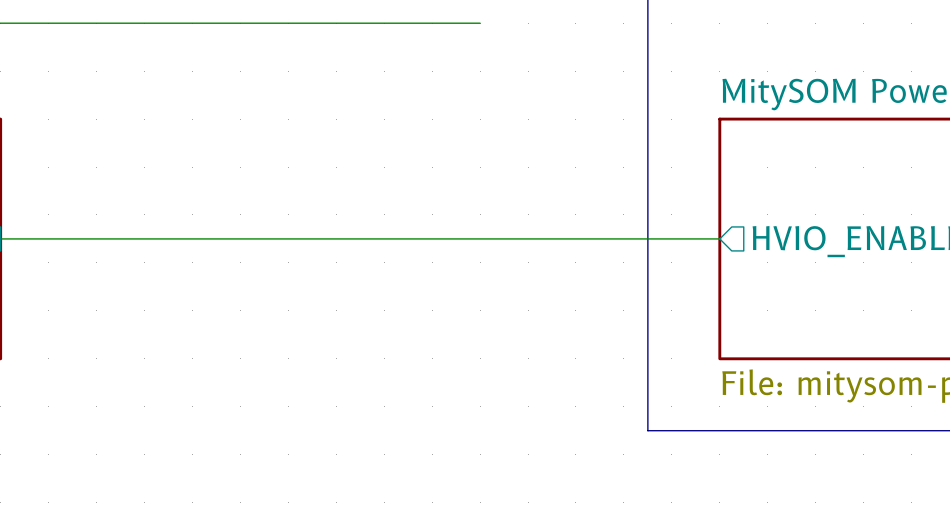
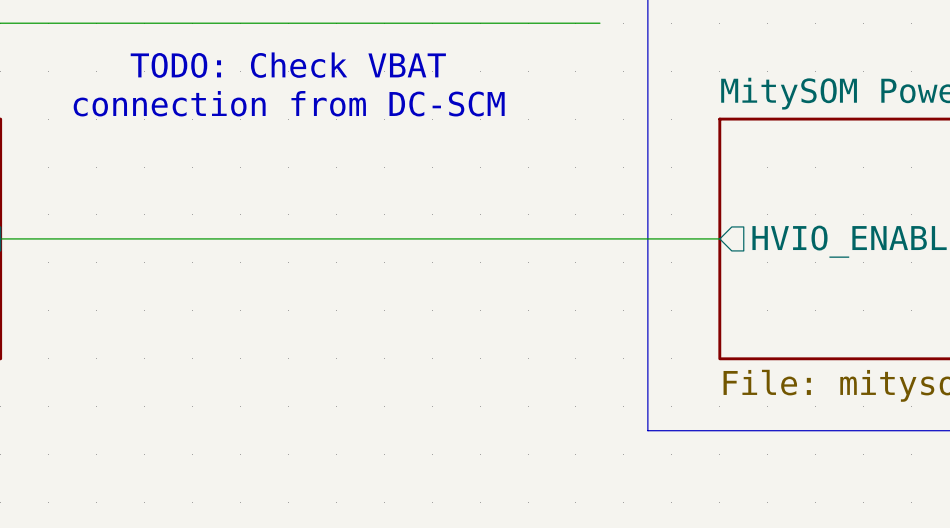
wire: none -> (480, 23) (599, 23)
text: none -> TODO: Check VBAT (288, 65)
text: none -> connection from DC-SCM (289, 103)

